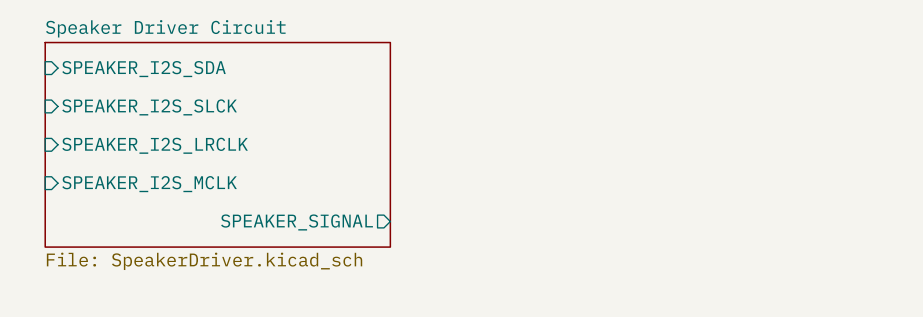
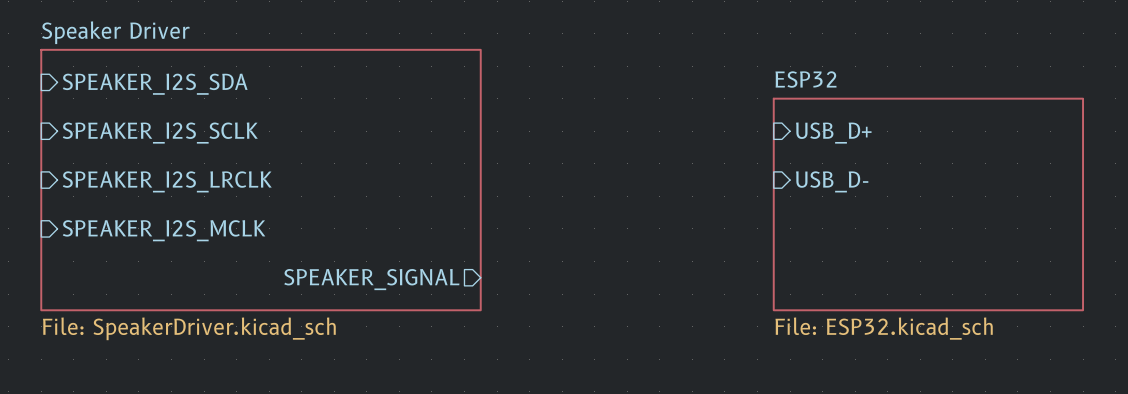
sheet Speaker Driver Circuit name: Speaker Driver Circuit (165, 28) -> Speaker Driver (115, 32)
sheet pin: SPEAKER_I2S_SLCK (149, 107) -> SPEAKER_I2S_SCLK (160, 133)
sheet pin: none -> USB_D+ (833, 133)
sheet pin: none -> USB_D- (832, 181)
sheet ESP32: none -> File: ESP32.kicad_sch (928, 204)

